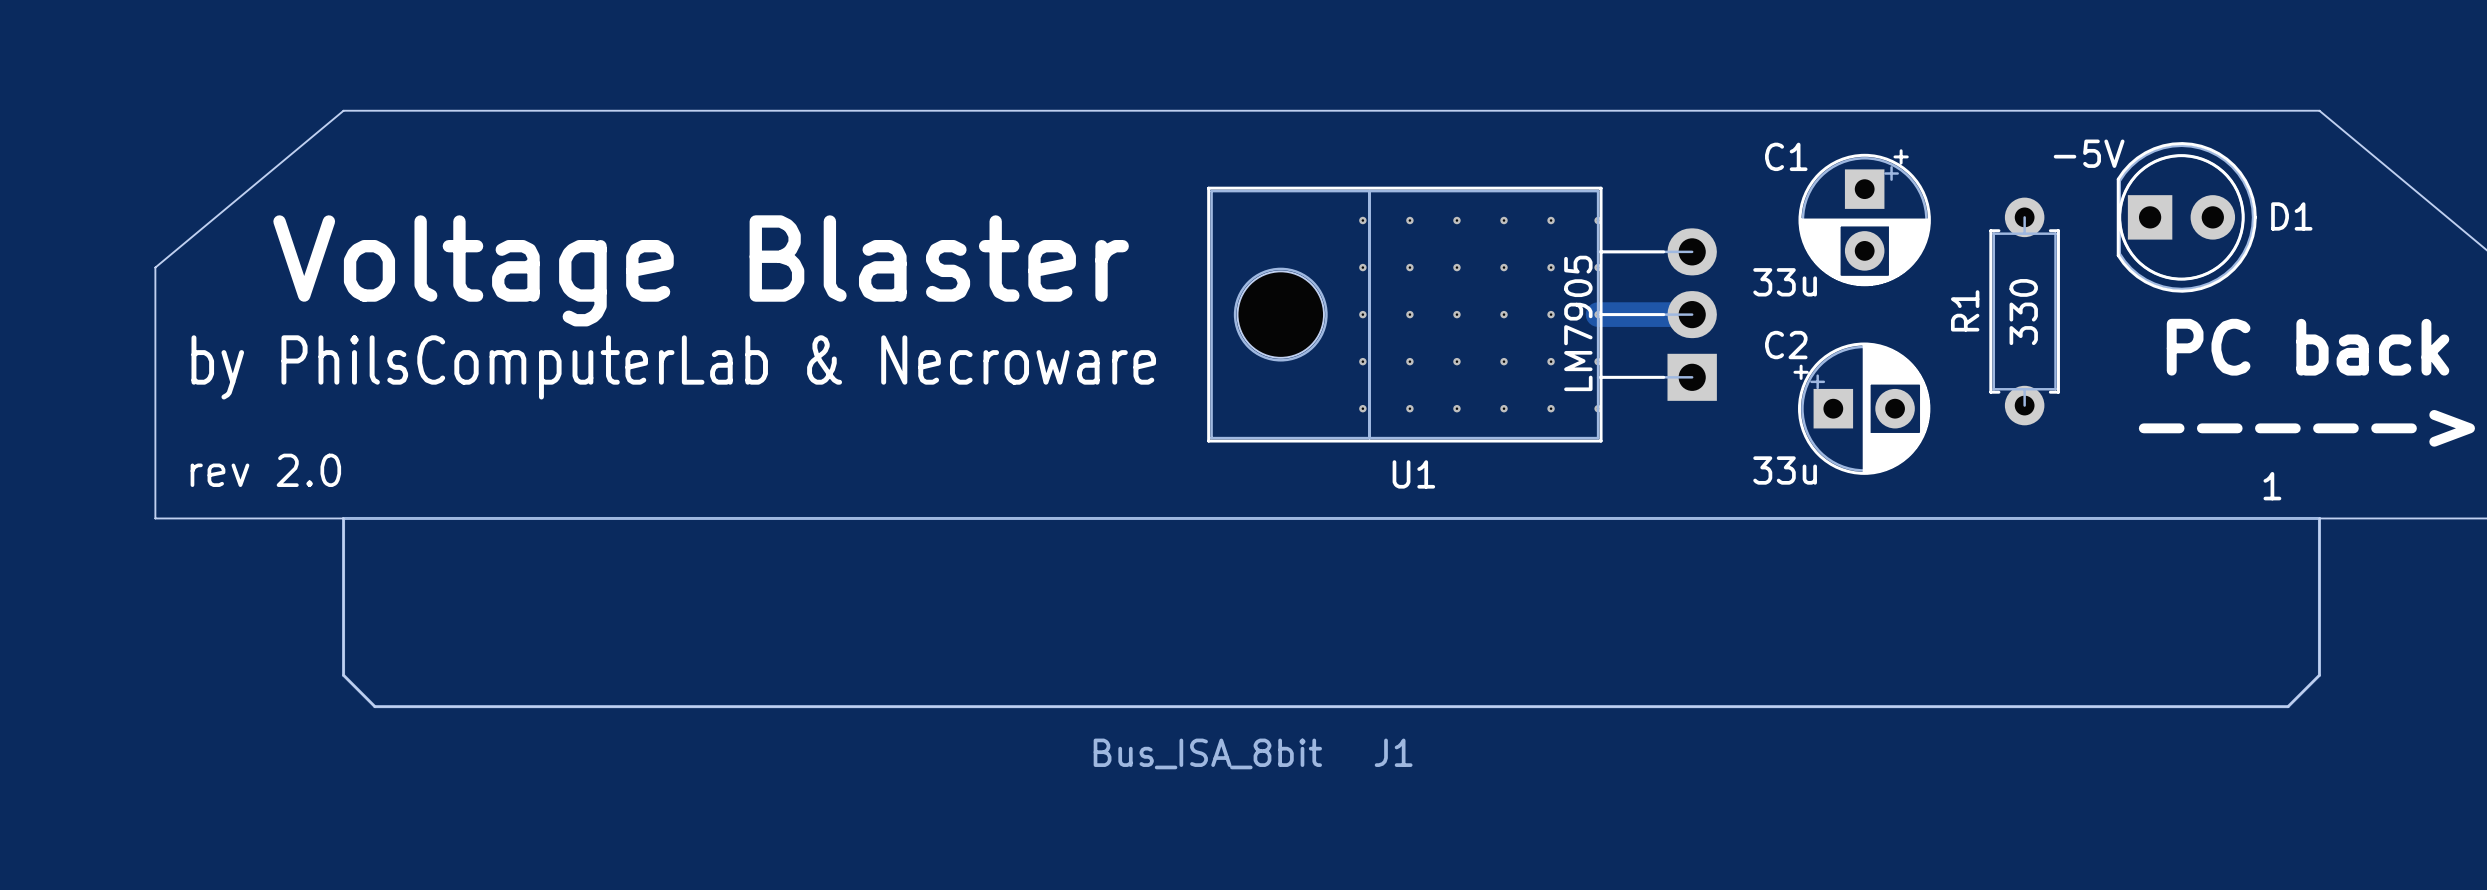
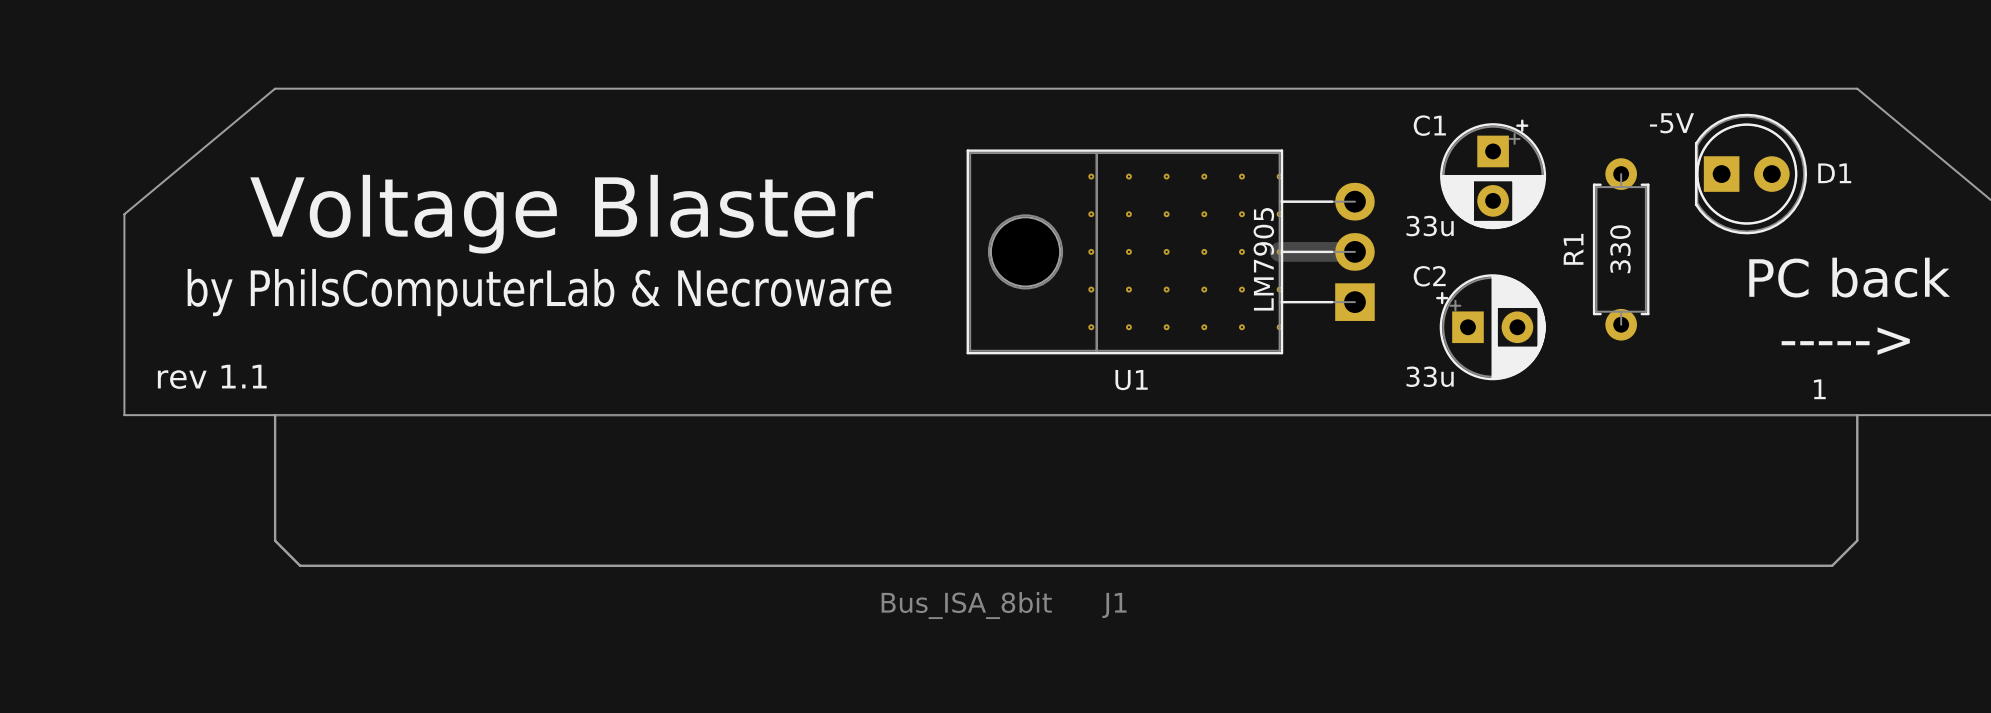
text: rev 2.0 (265, 470) -> rev 1.1 (212, 376)

